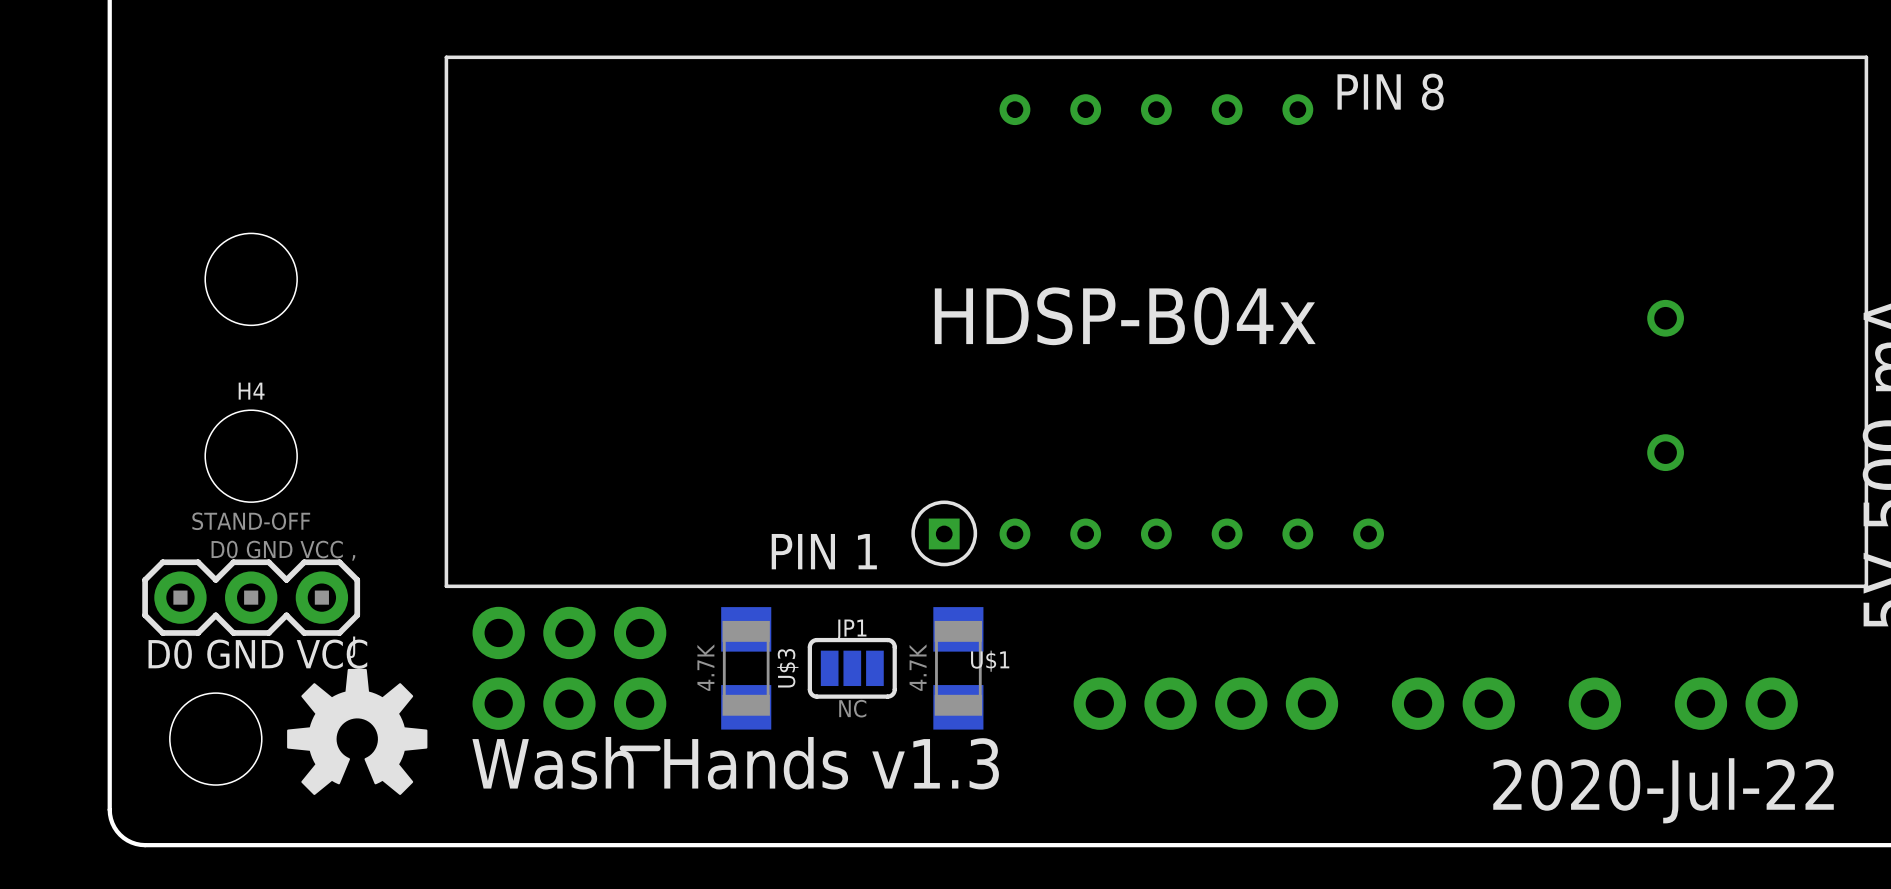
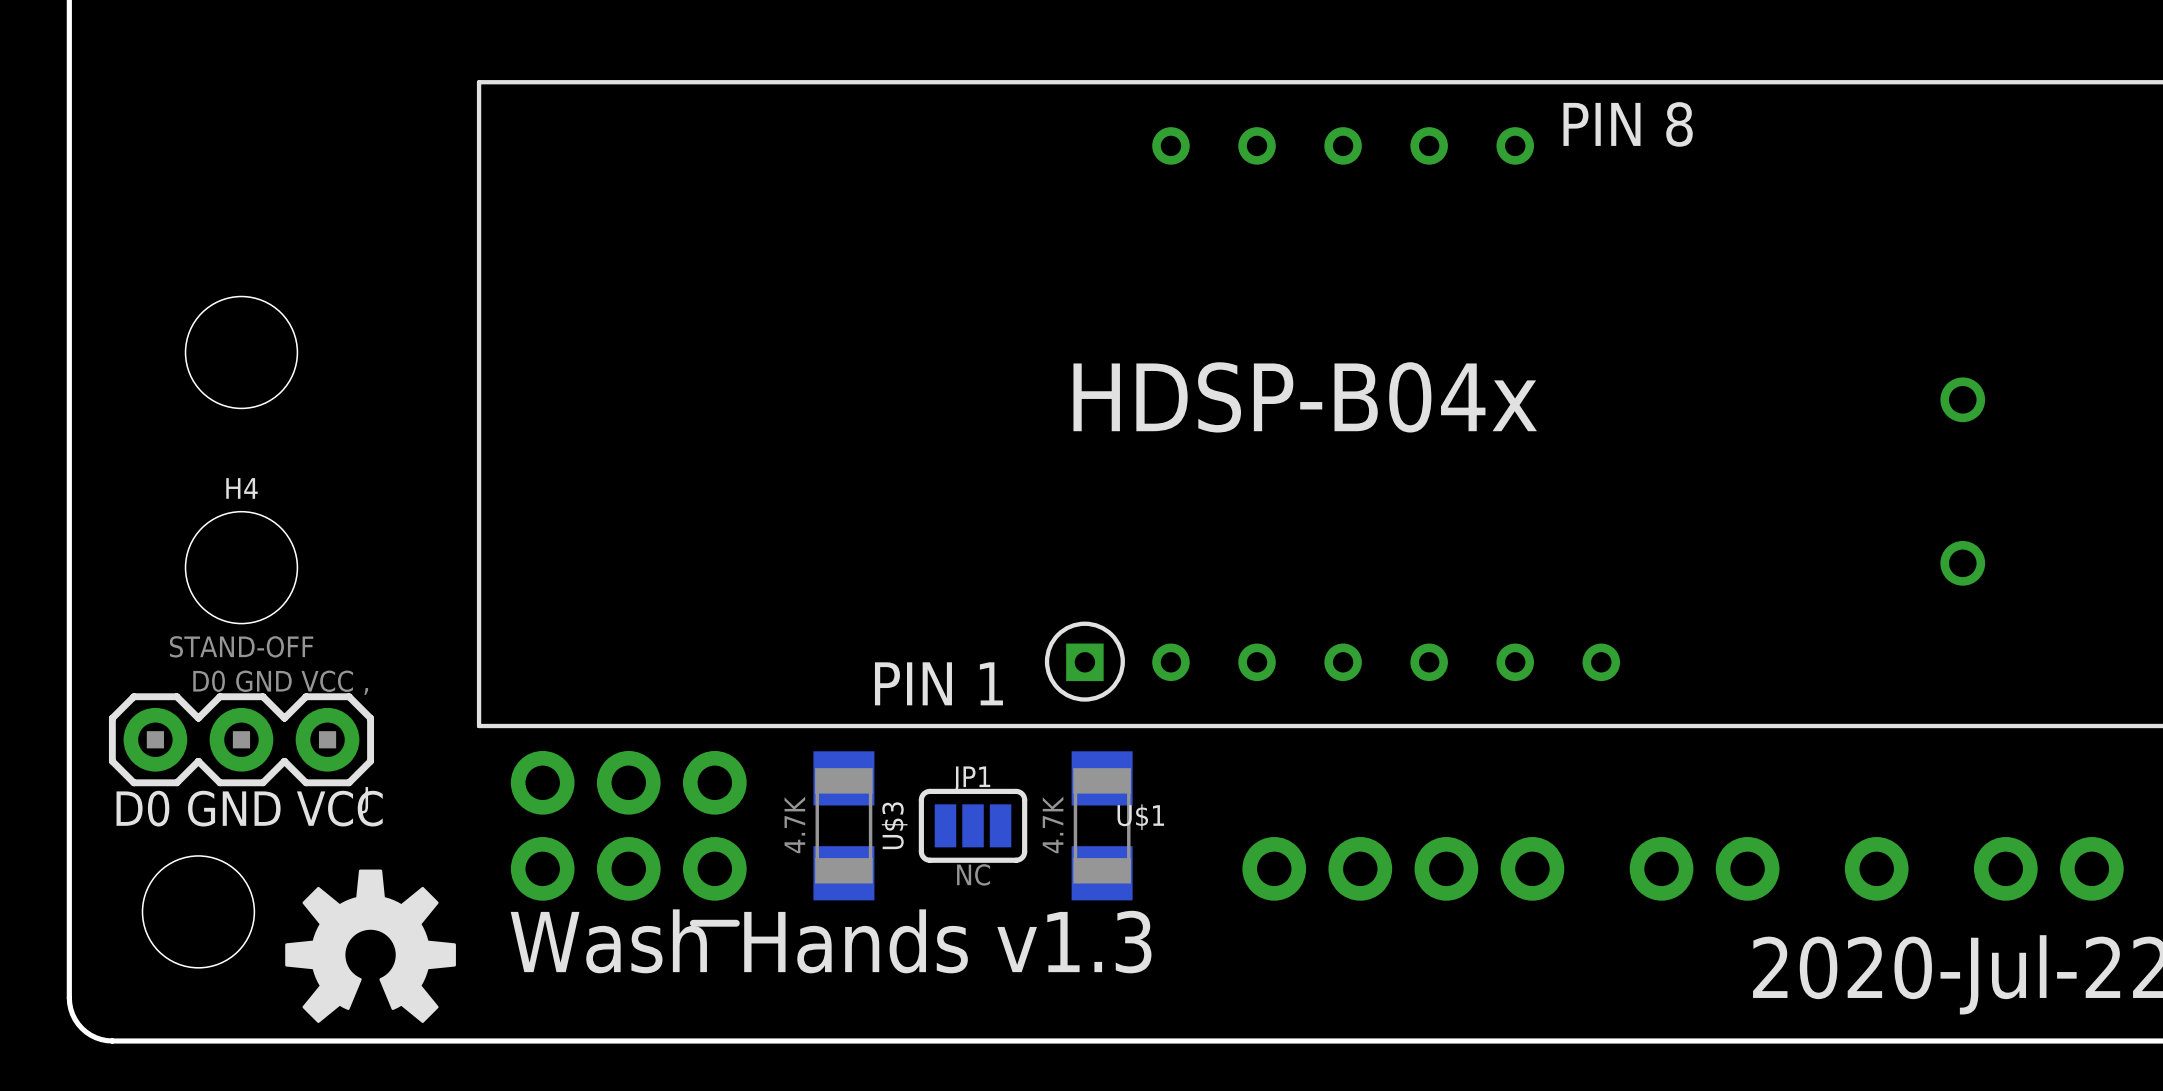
drawing position: (357, 731) -> (370, 946)

